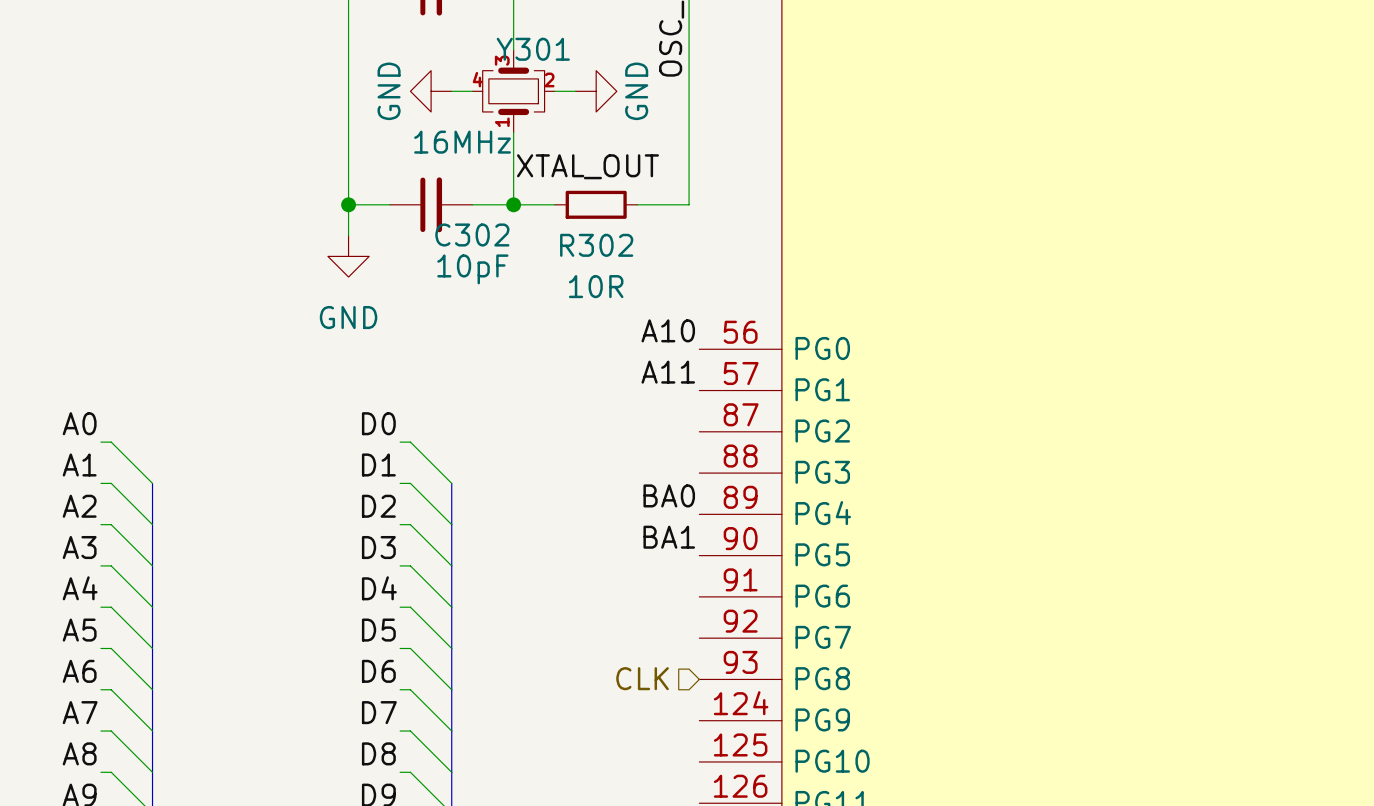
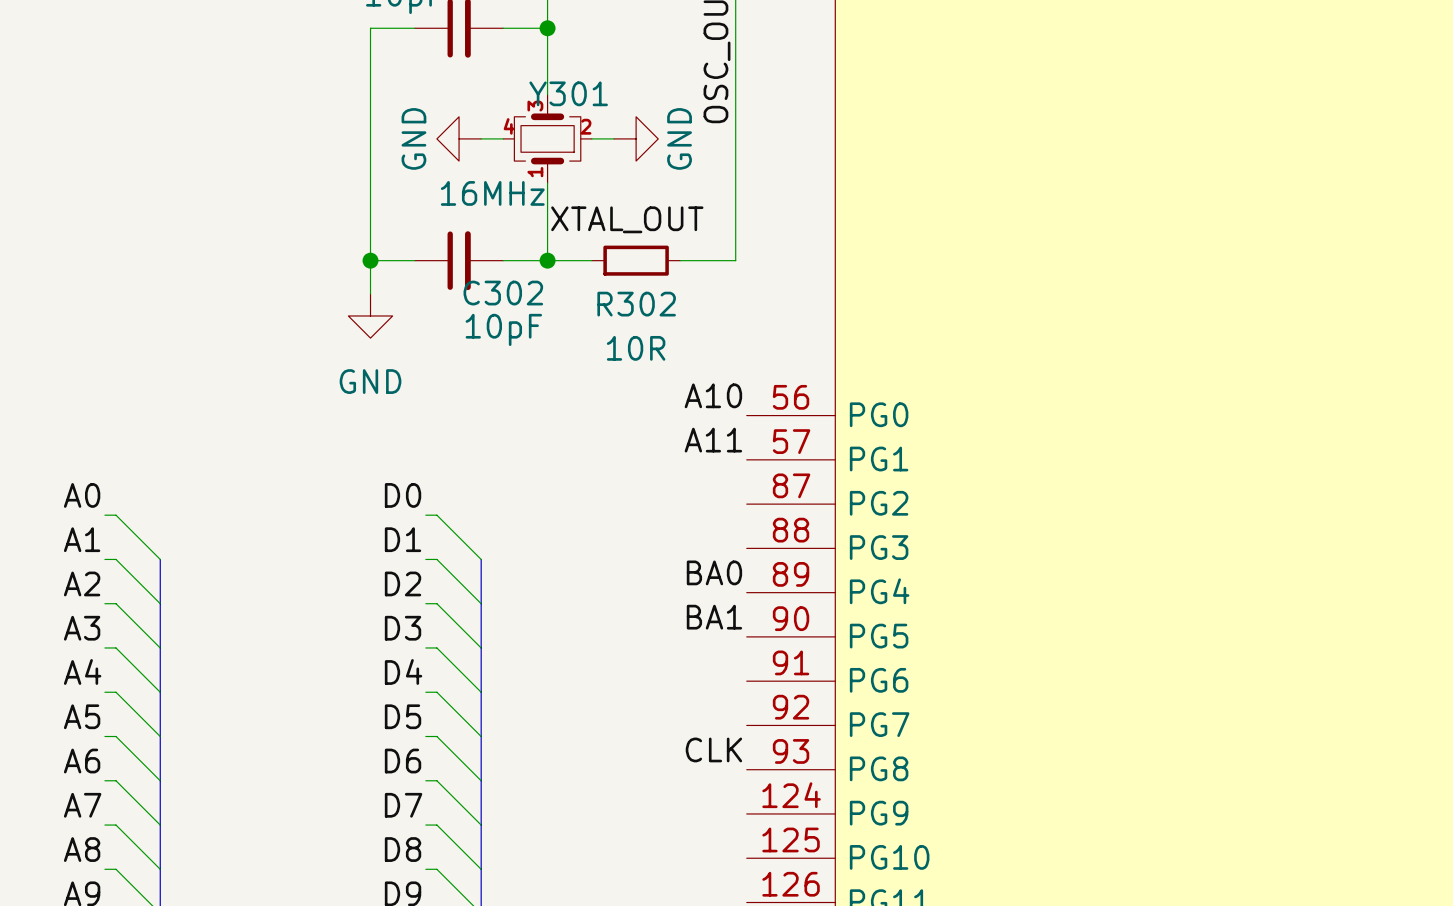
label: none -> CLK (713, 749)
hierarchical label: CLK (642, 678) -> none

